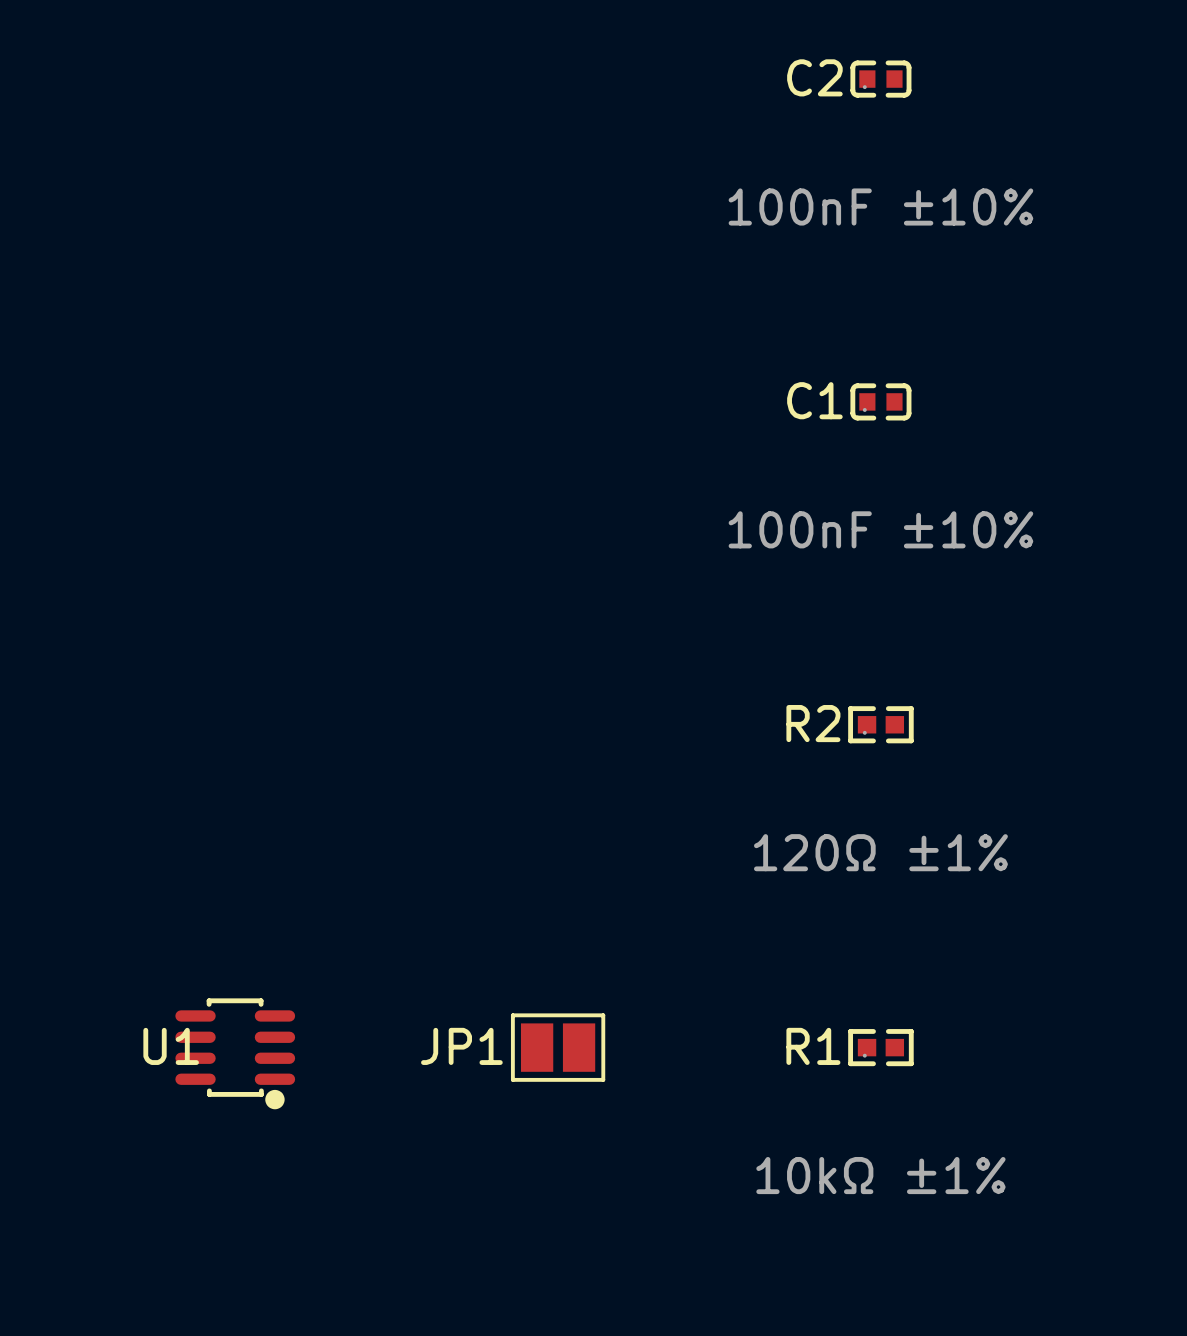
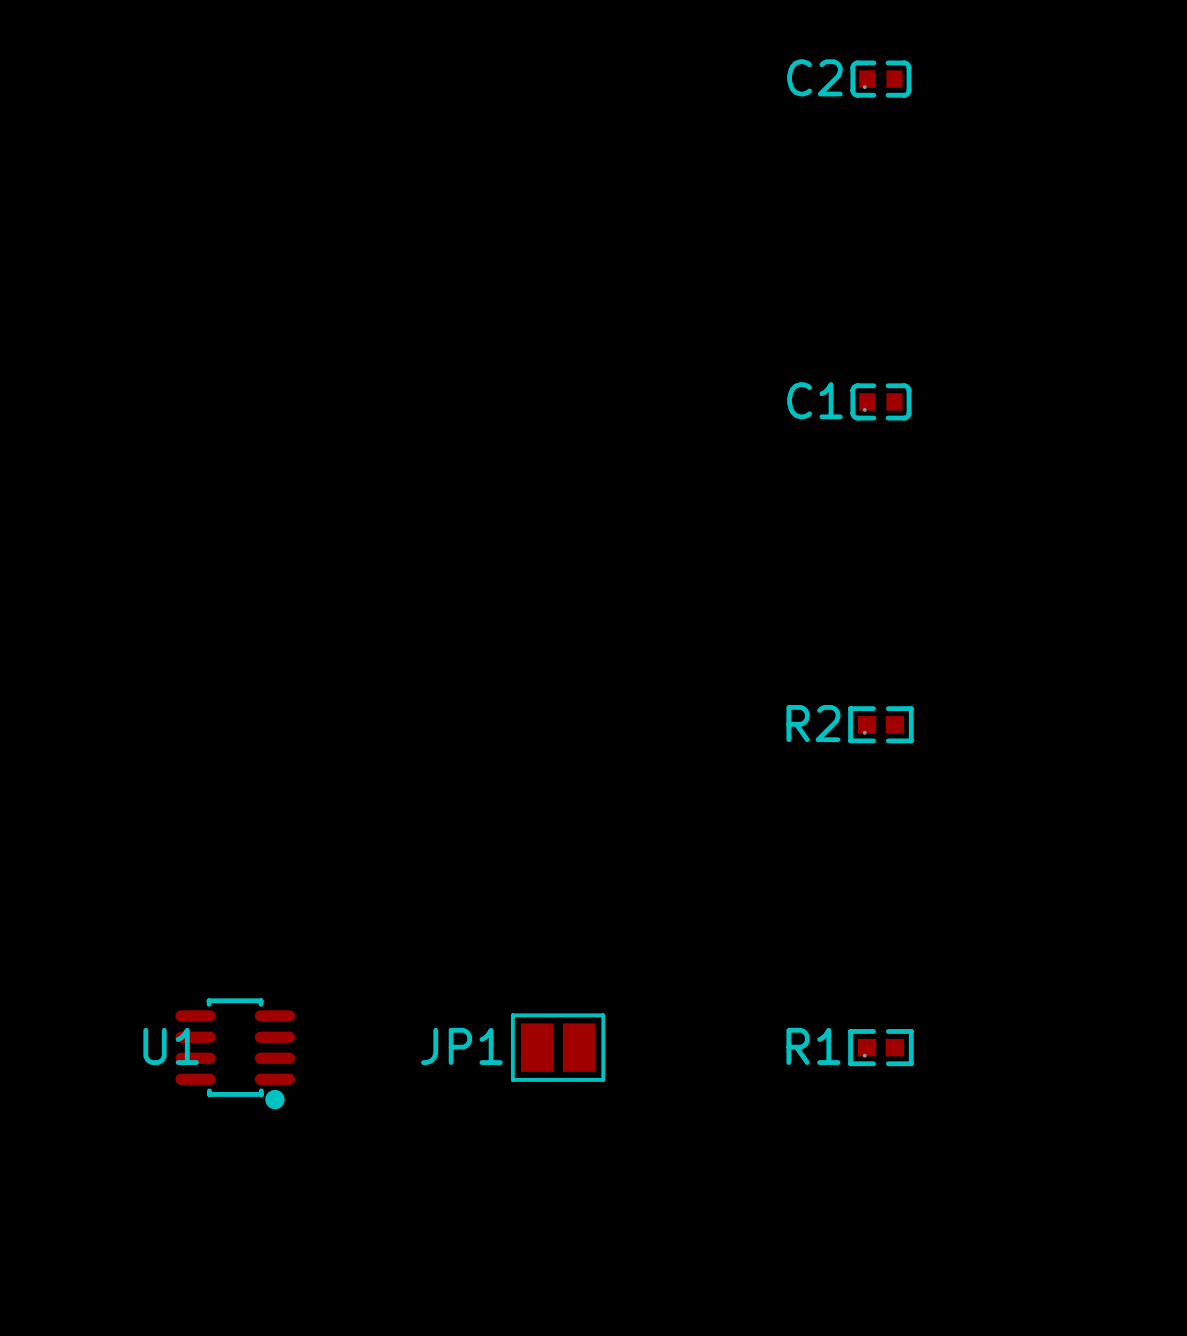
C2 value: 100nF ±10% (880, 207) -> none
C1 value: 100nF ±10% (880, 529) -> none
R2 value: 120Ω ±1% (880, 852) -> none
R1 value: 10kΩ ±1% (880, 1175) -> none

